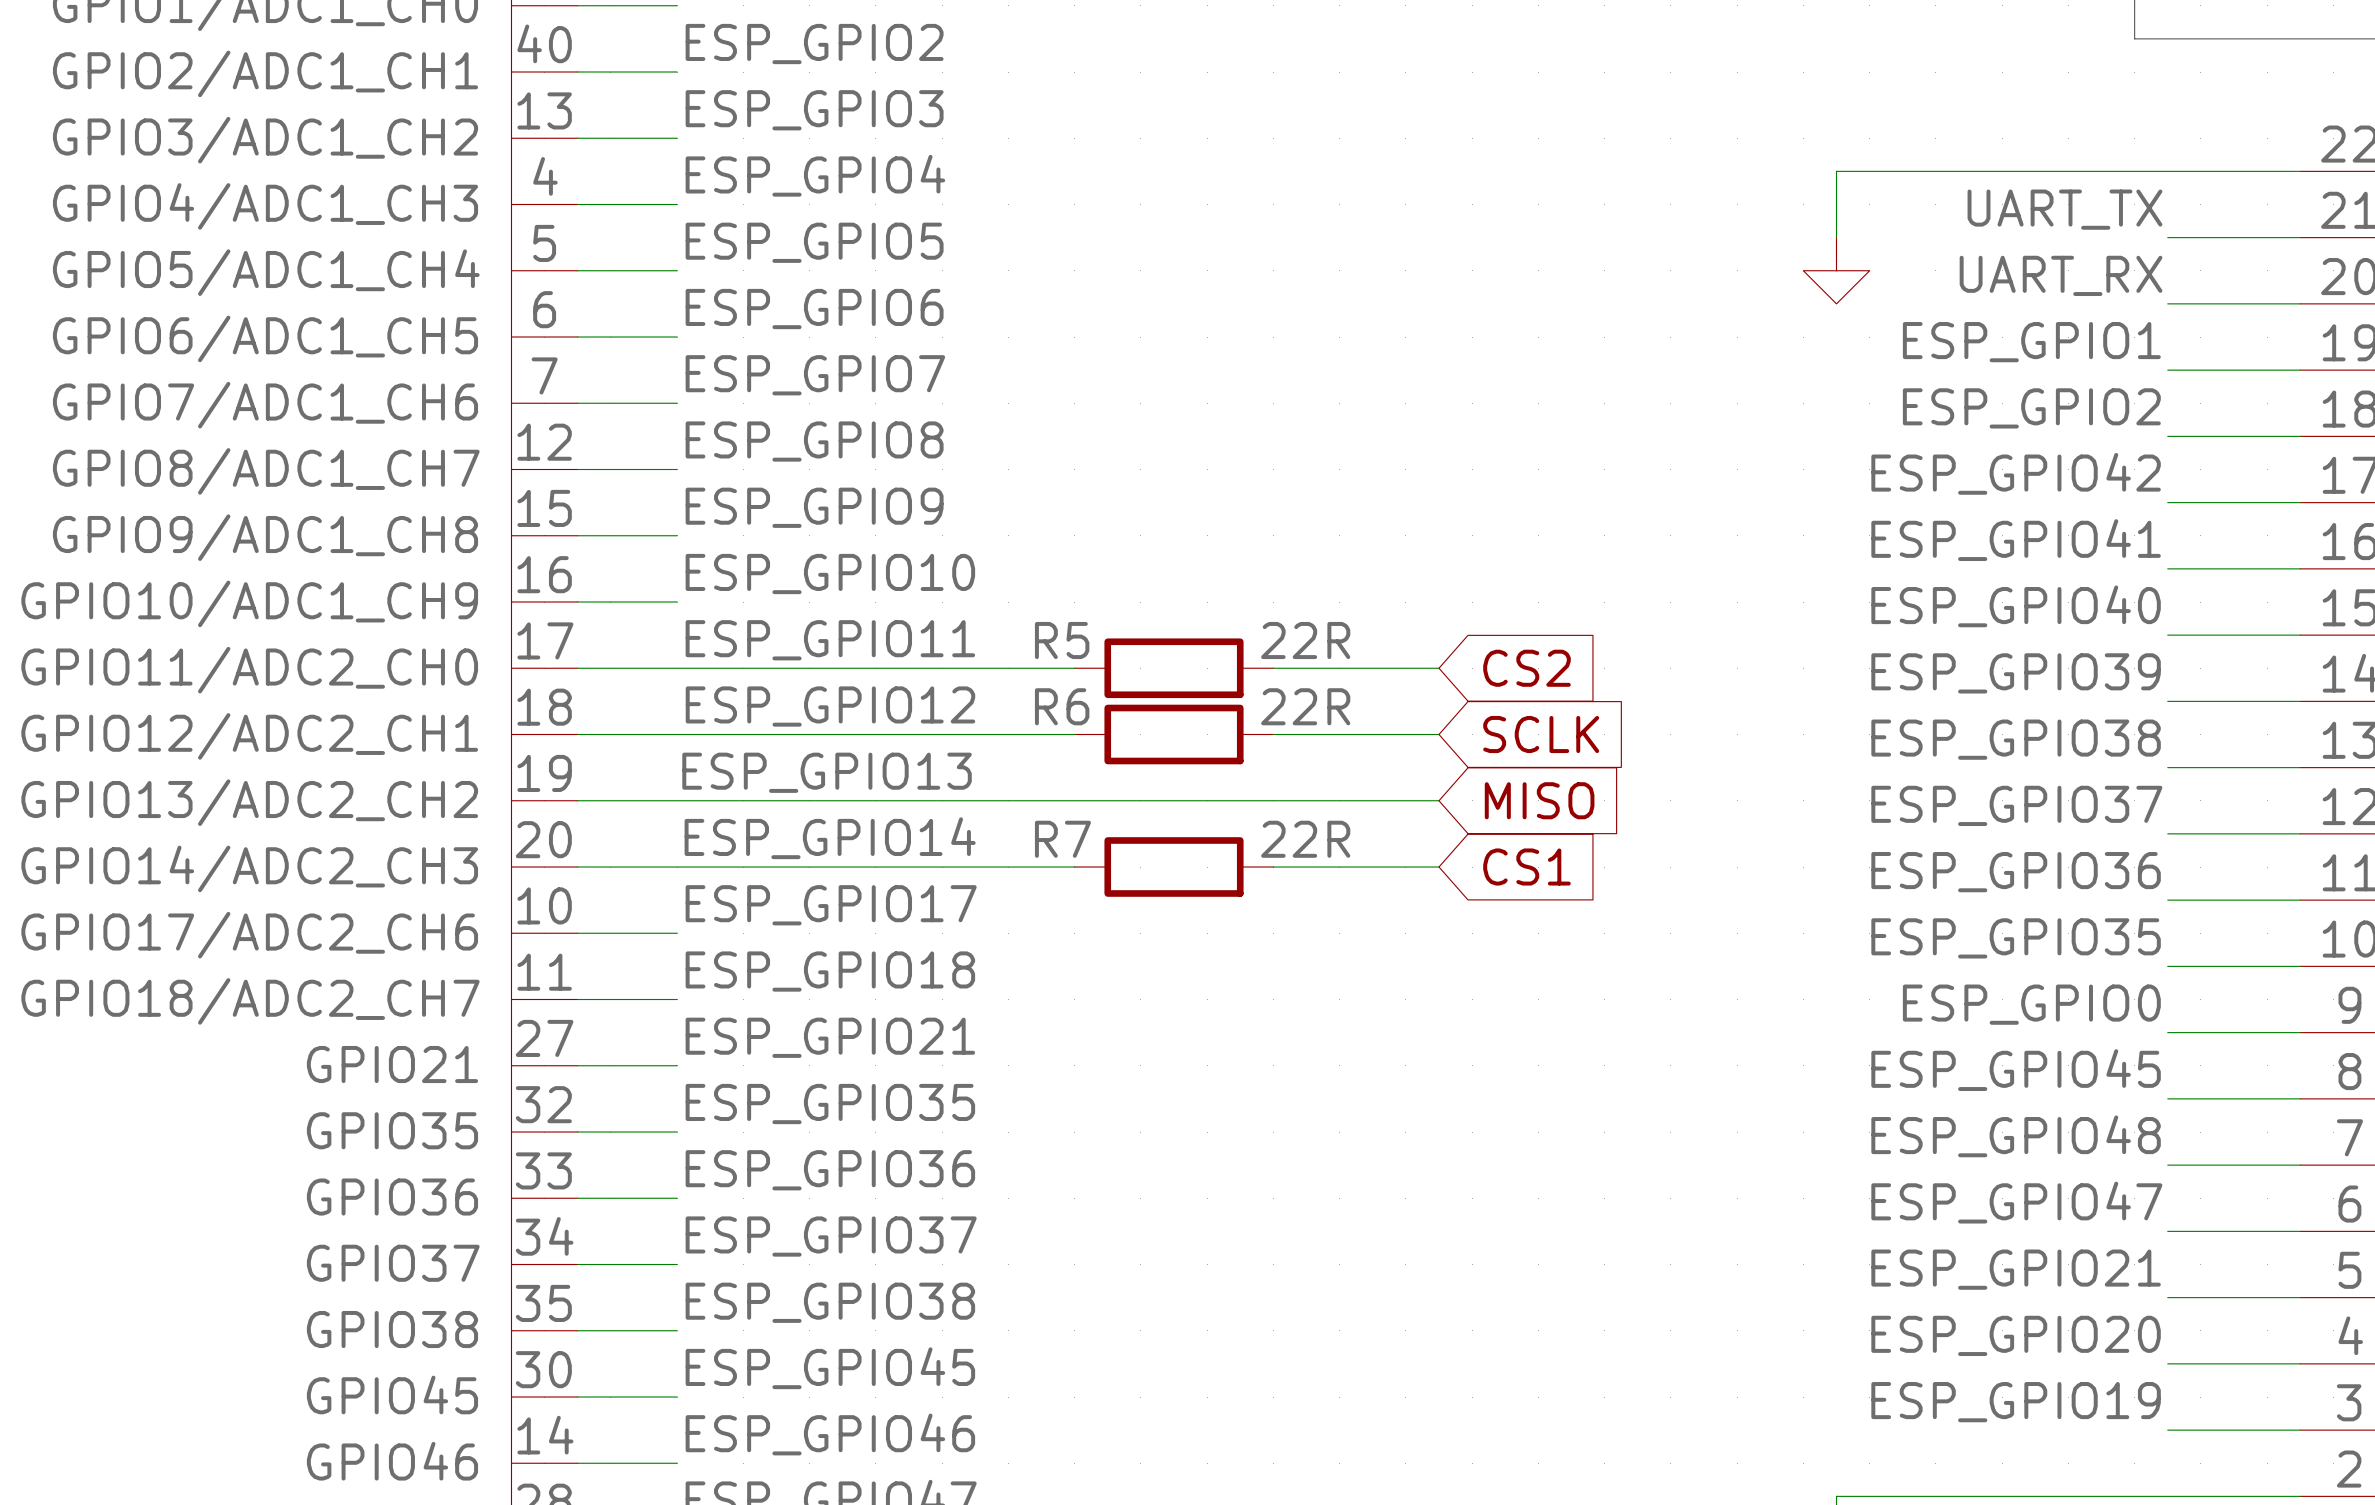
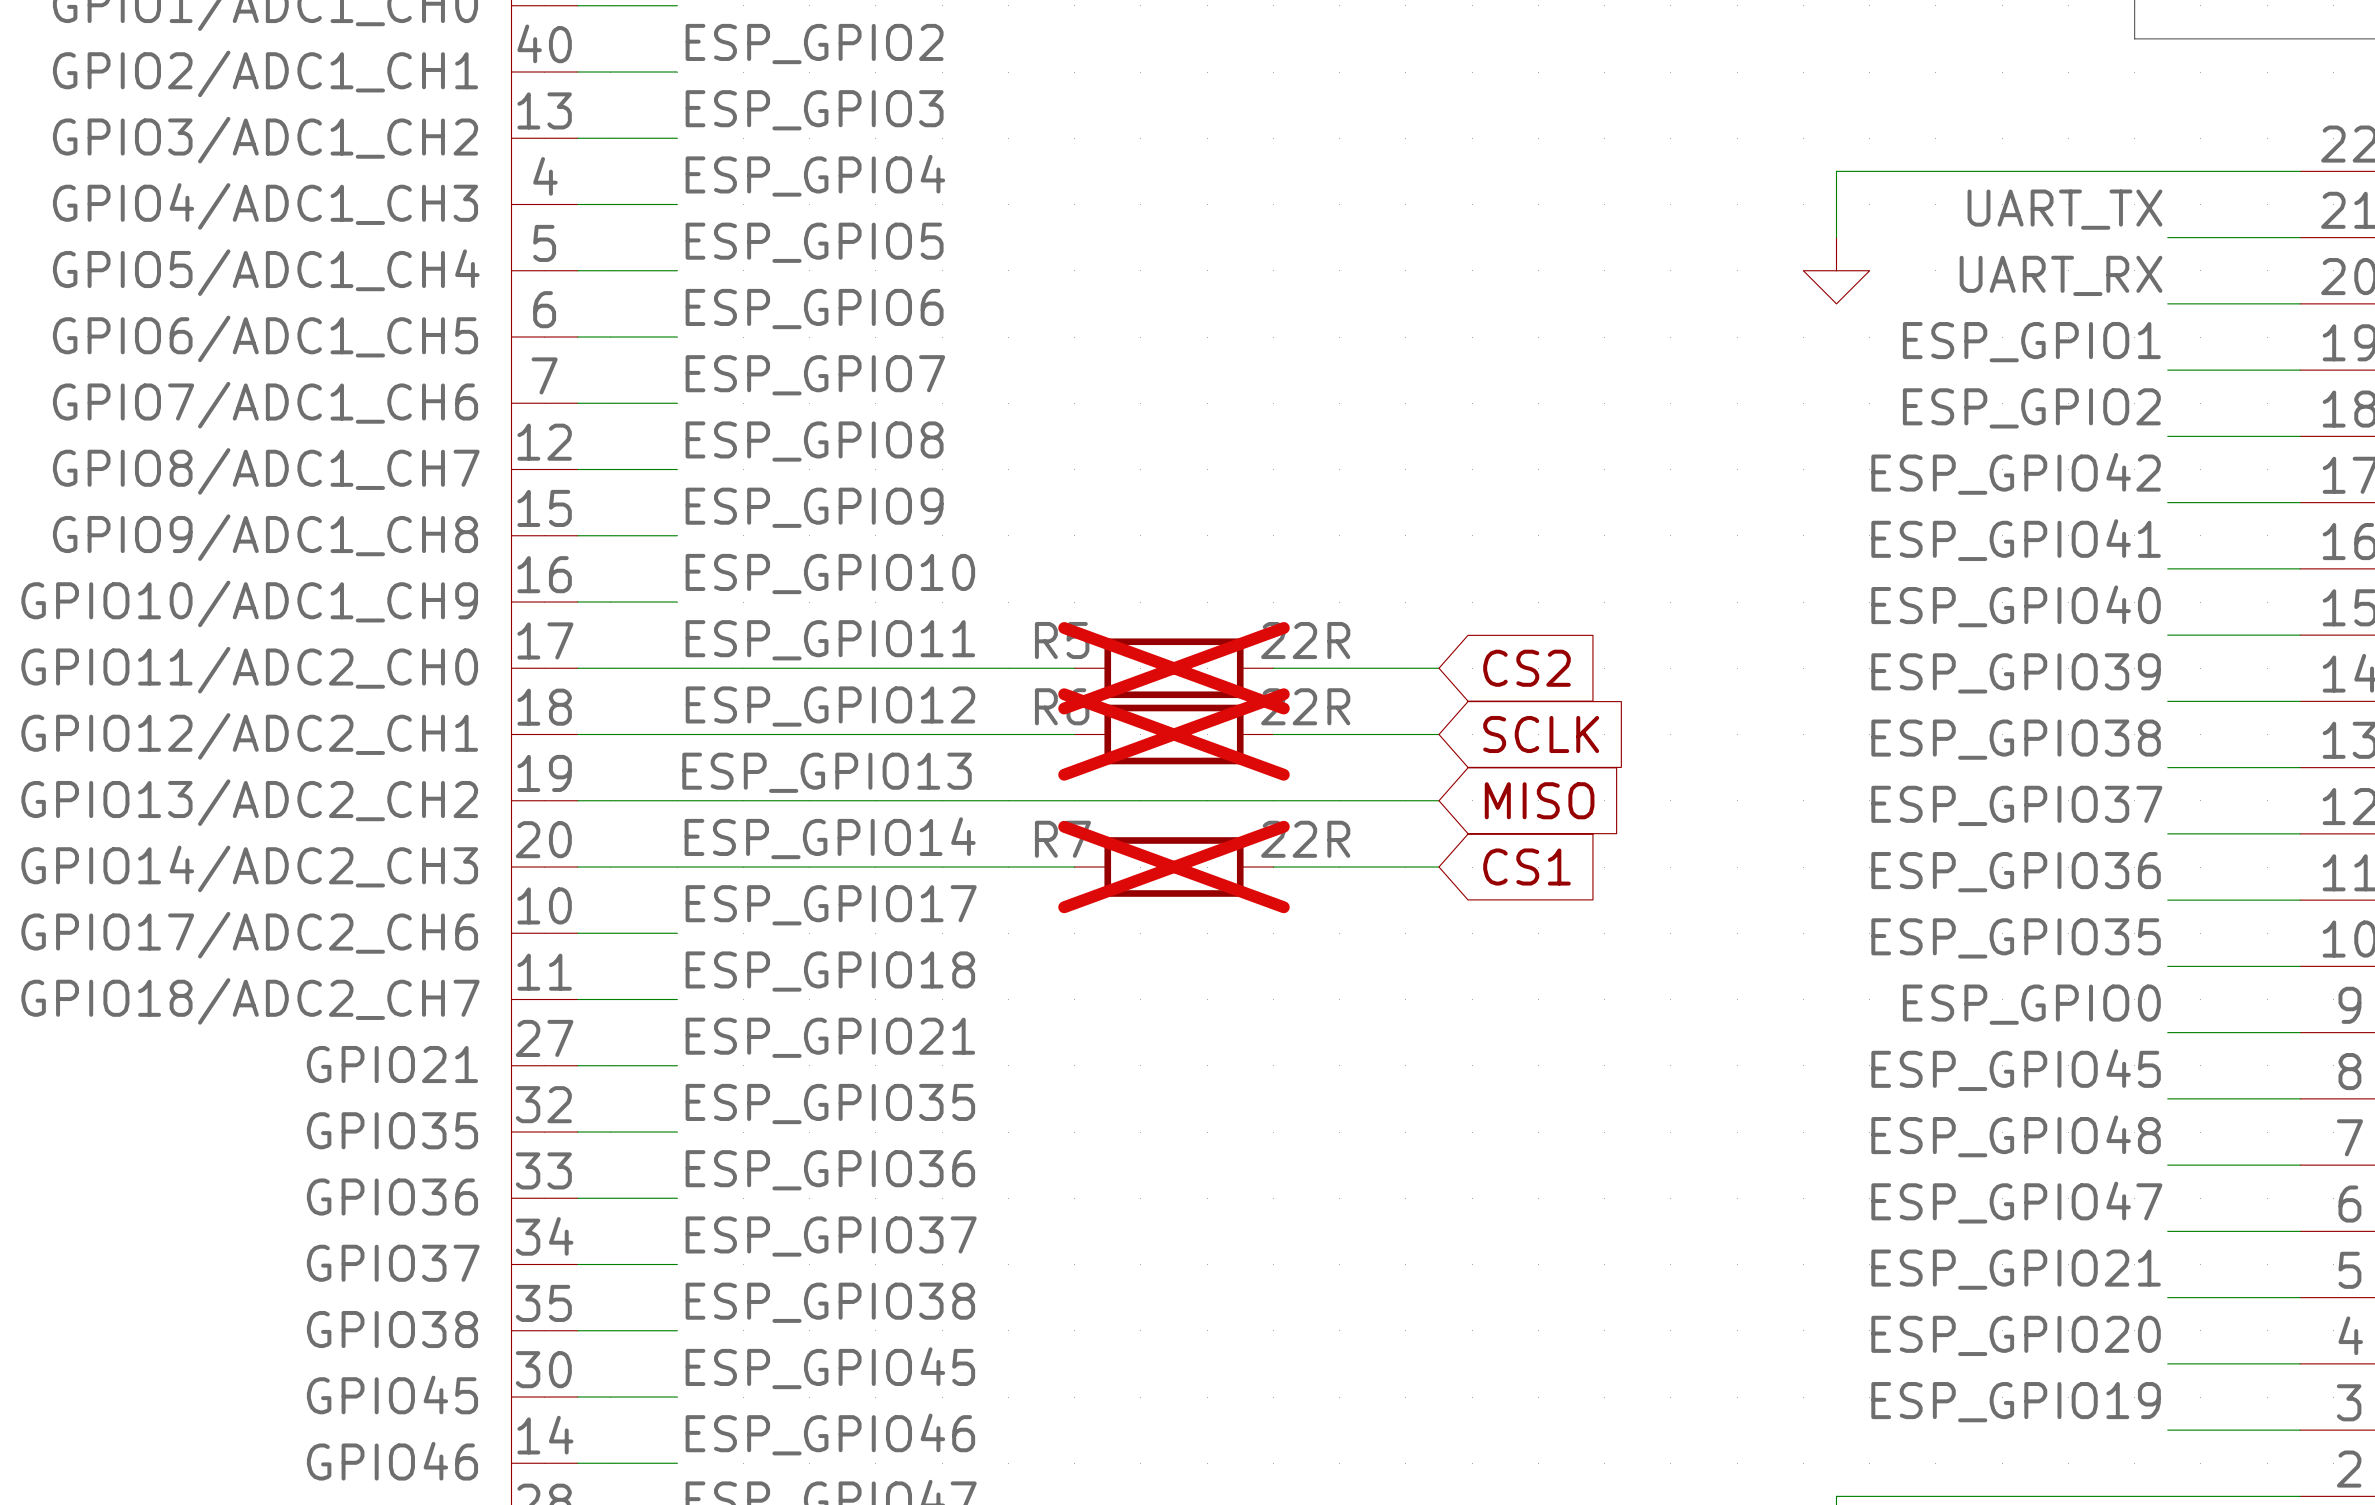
R5 do-not-place cross: none -> (1173, 668)
R6 do-not-place cross: none -> (1173, 734)
R7 do-not-place cross: none -> (1173, 867)

